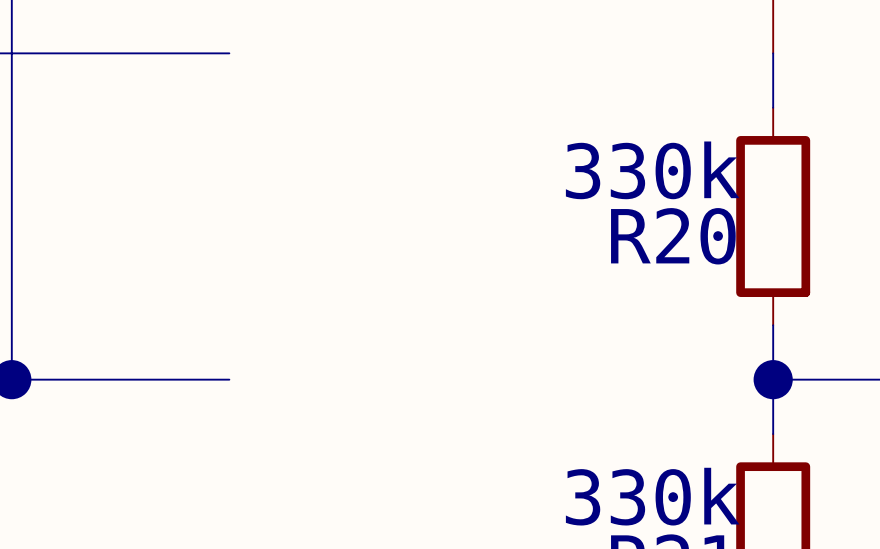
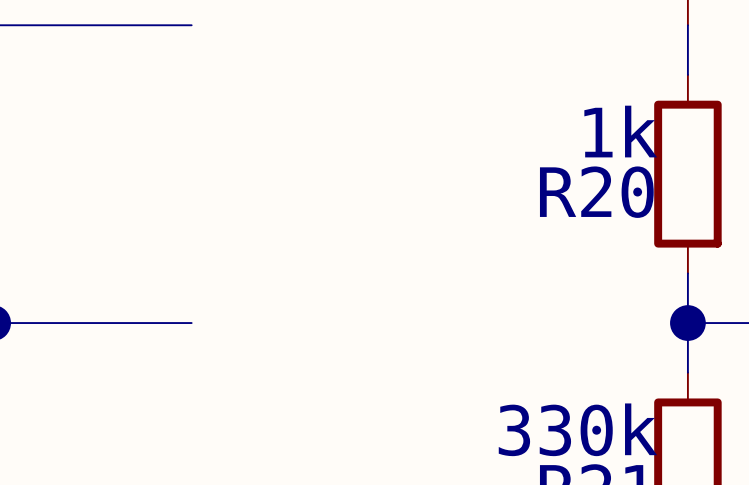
R20 value: 330k (652, 170) -> 1k (620, 131)

